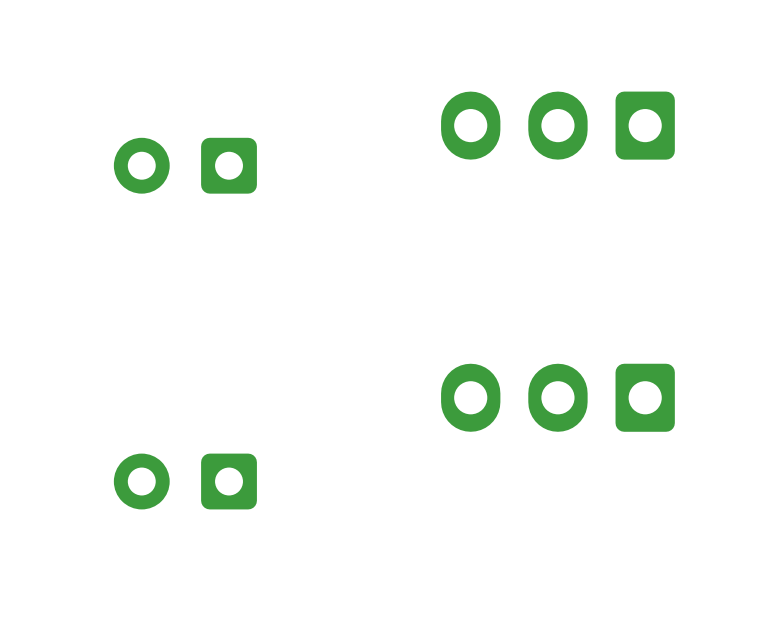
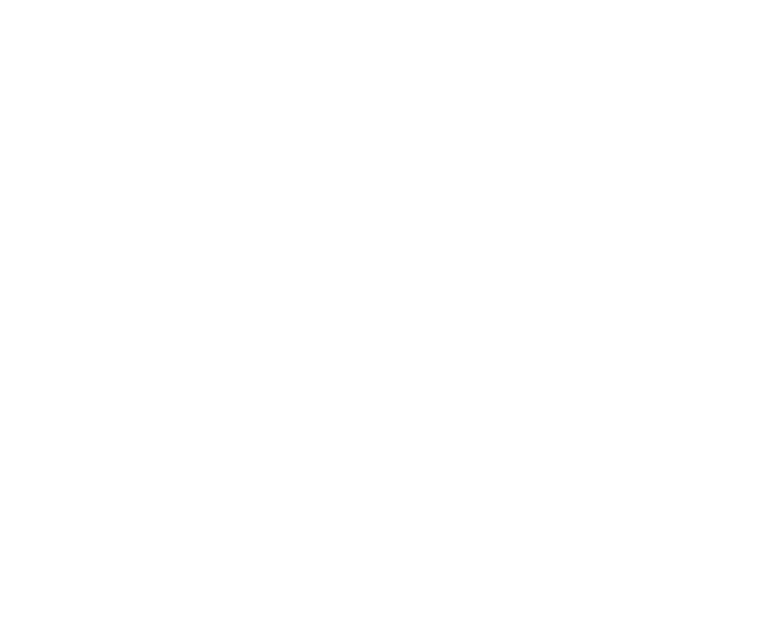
part: (557, 125) -> none
part: (185, 165) -> none
part: (557, 397) -> none
part: (185, 481) -> none

